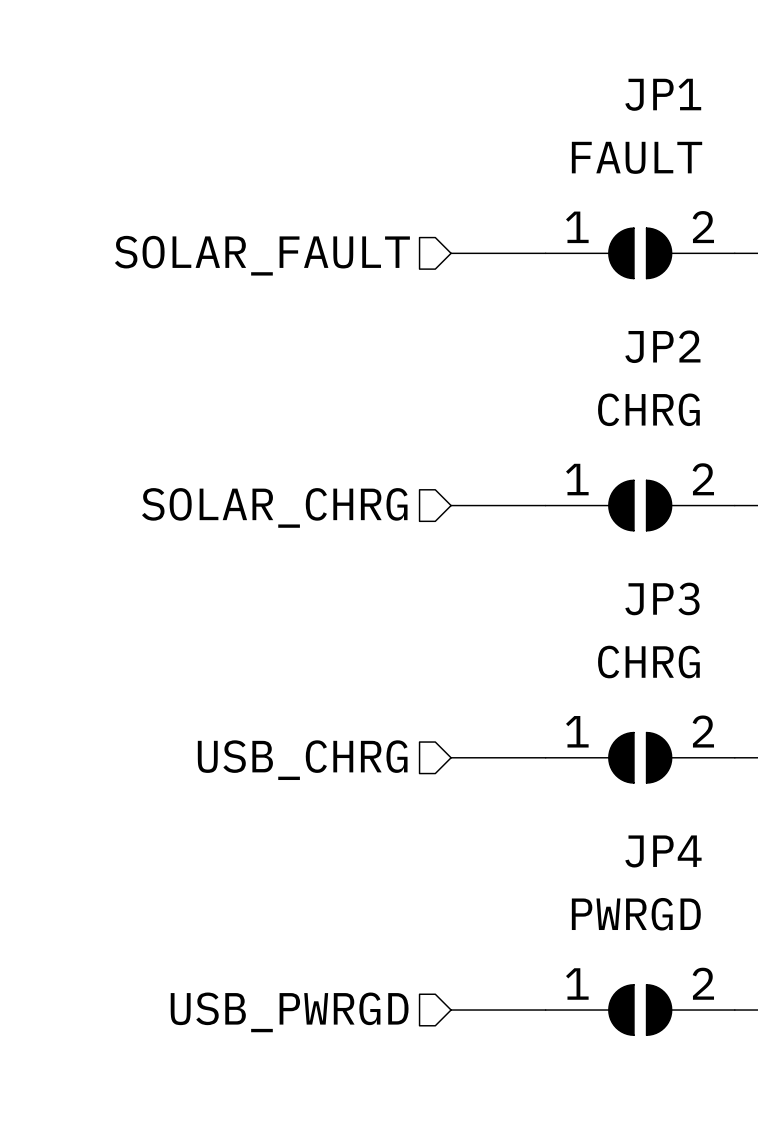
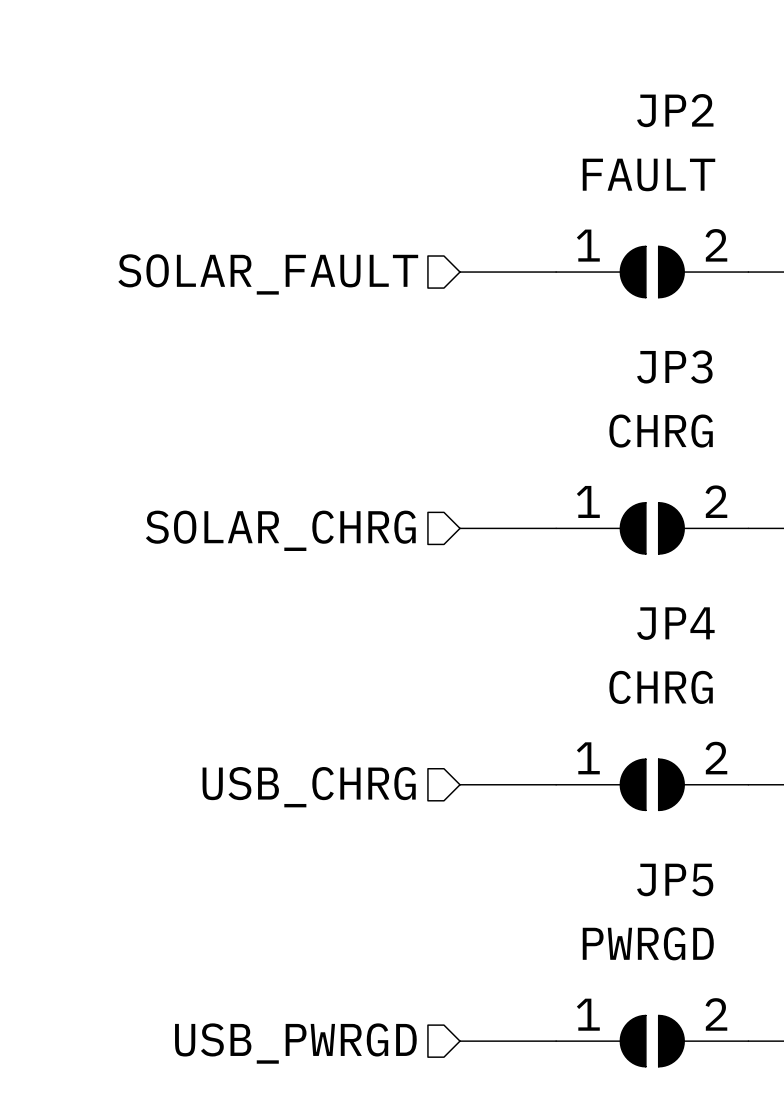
JP1 name: JP1 (663, 94) -> JP2 (675, 110)
JP2 name: JP2 (662, 346) -> JP3 (674, 366)
JP3 name: JP3 (662, 598) -> JP4 (675, 623)
JP4 name: JP4 (663, 851) -> JP5 (675, 879)

